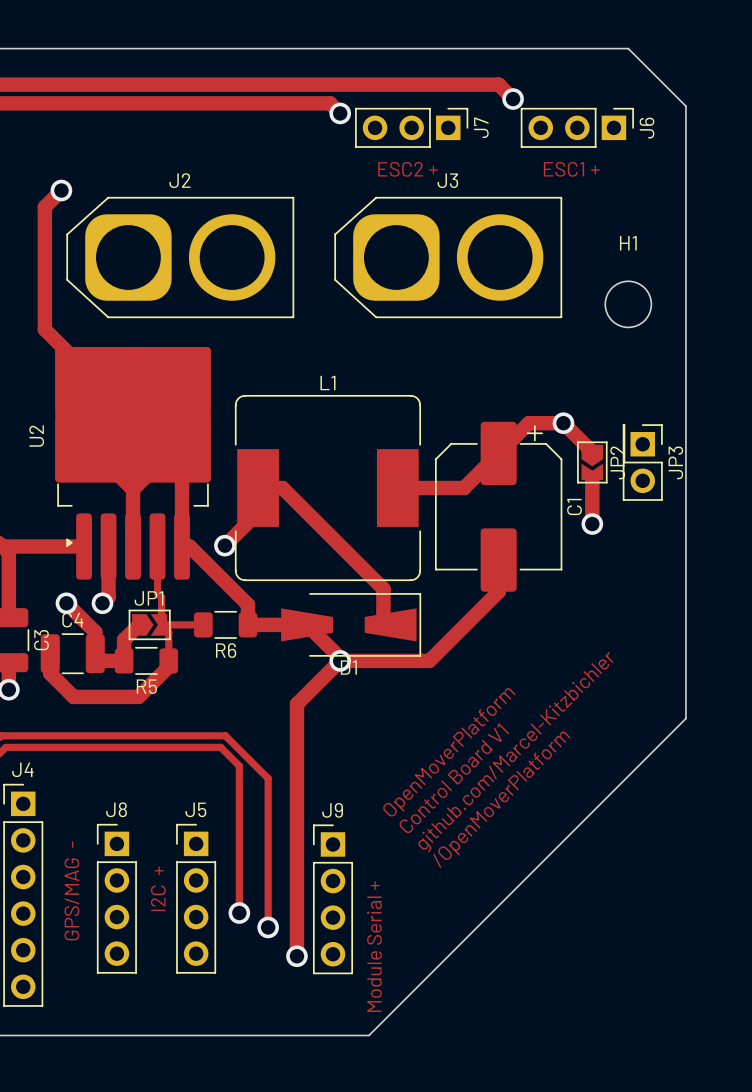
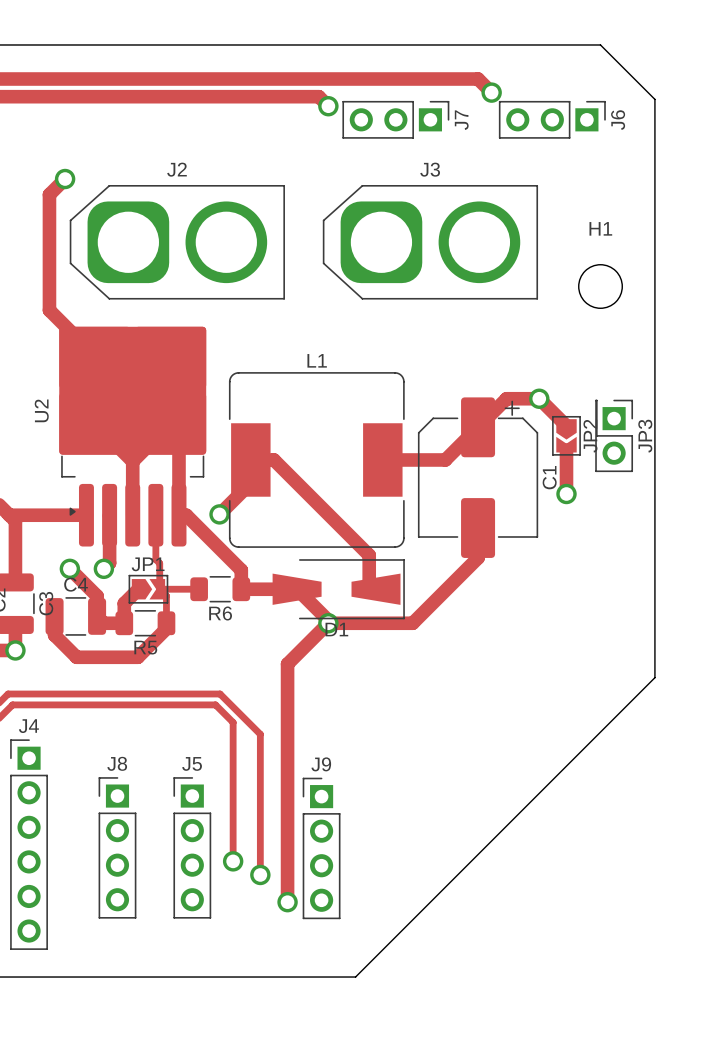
text: ESC2 + (407, 169) -> none
text: ESC1 + (571, 169) -> none
text: OpenMoverPlatform (449, 752) -> none
text: github.com/Marcel-Kitzbichler (515, 752) -> none
text: Control Board V1 (454, 778) -> none
text: /OpenMoverPlatform (502, 799) -> none
text: I2C + (158, 888) -> none
text: GPS/MAG - (71, 890) -> none
text: Module Serial + (374, 946) -> none

